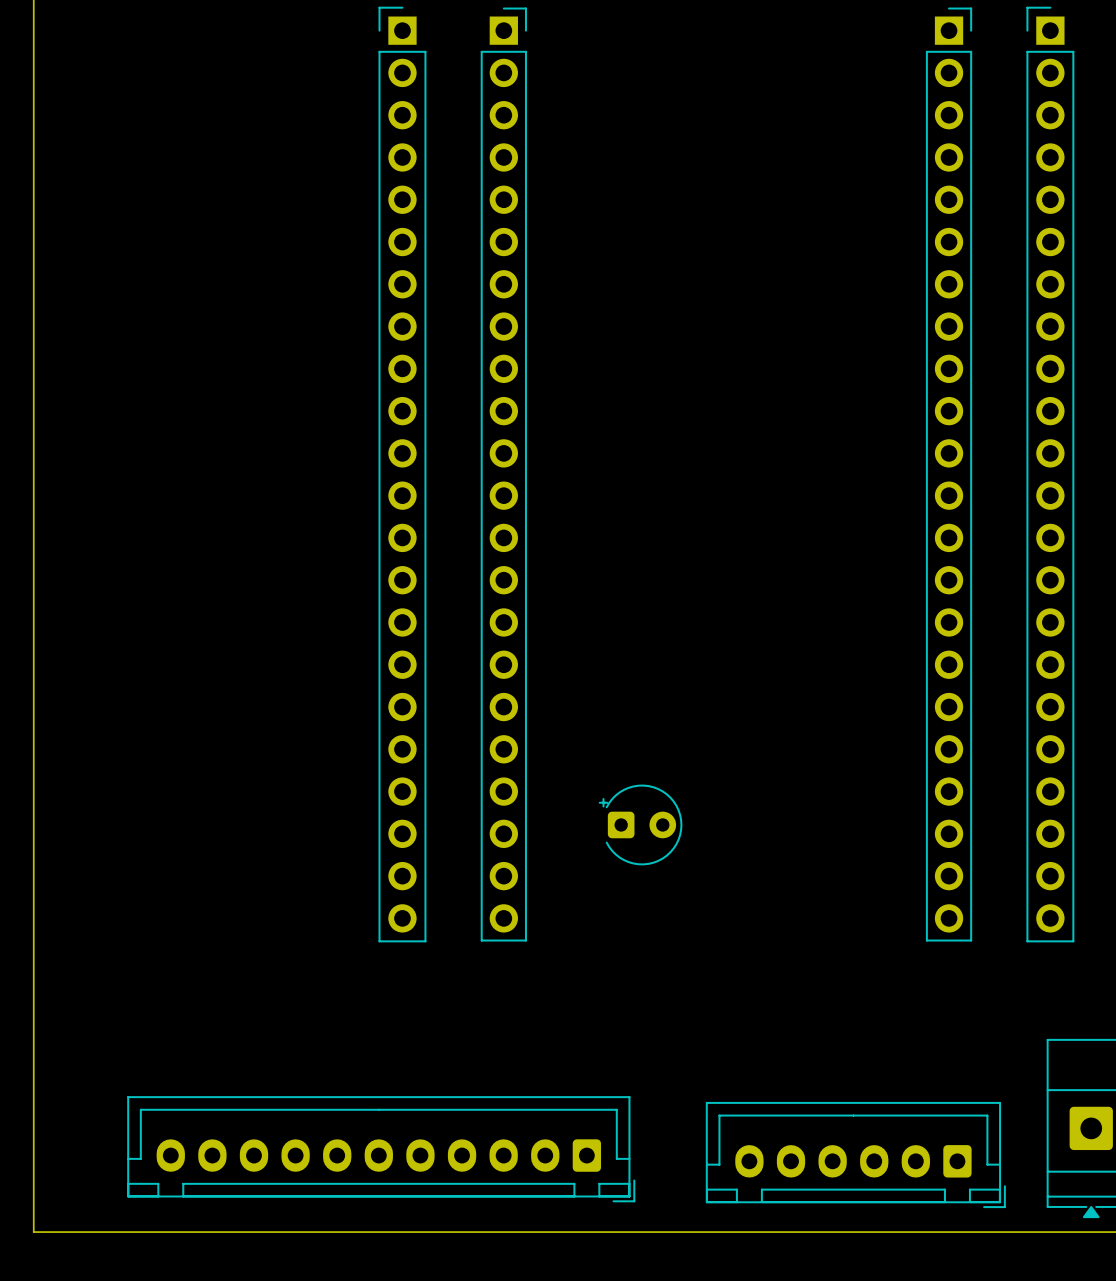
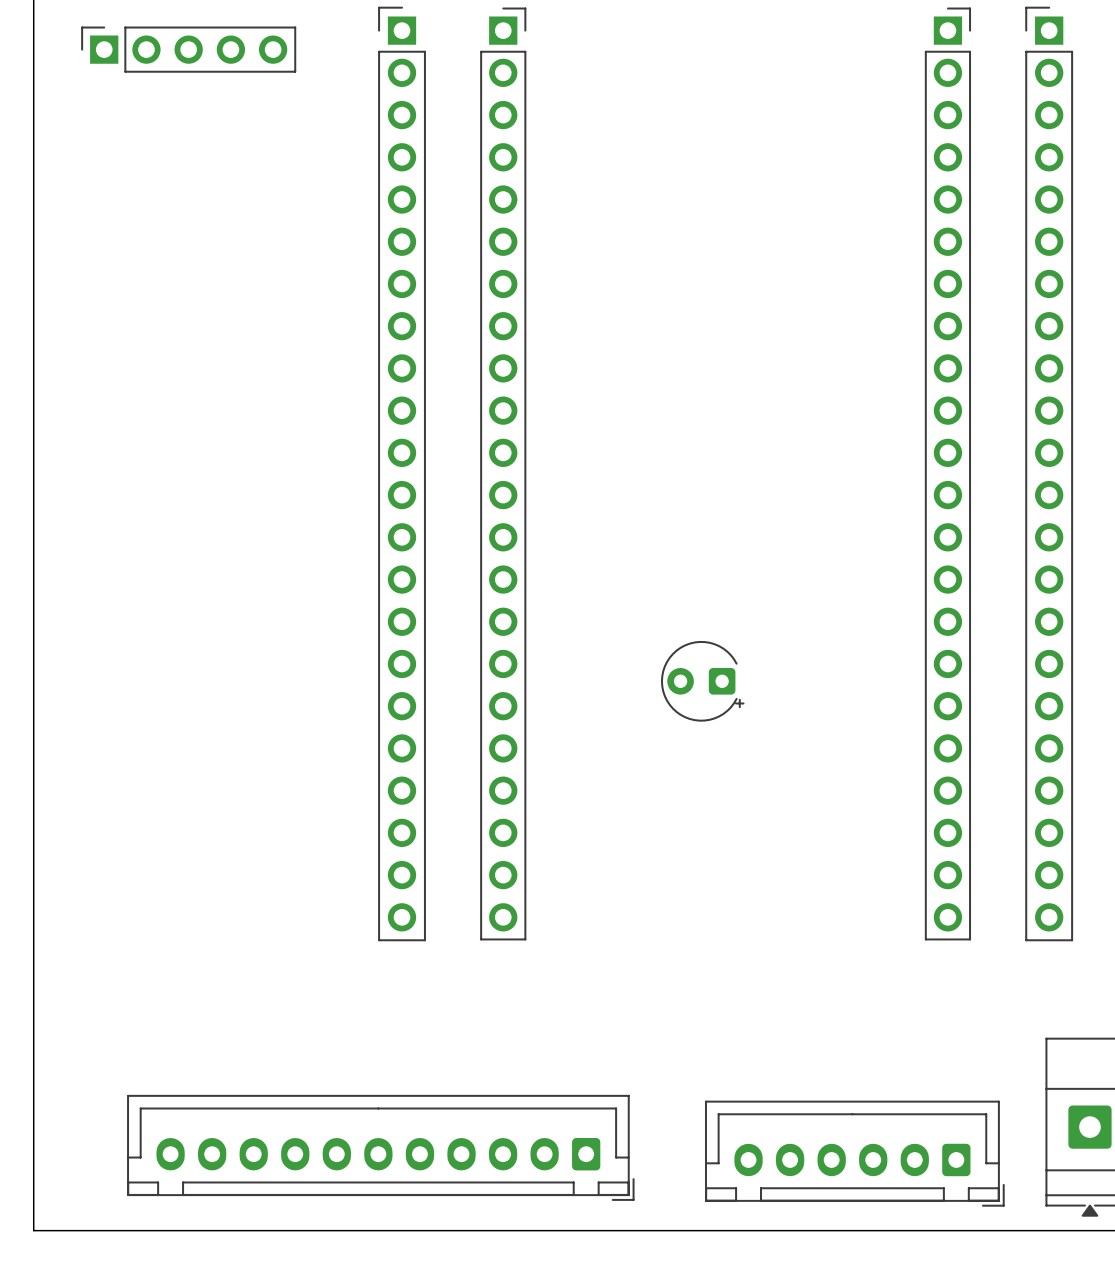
part: none -> (188, 49)
part rotation: 0° (640, 824) -> 180° (702, 681)
part position: (640, 824) -> (702, 681)

